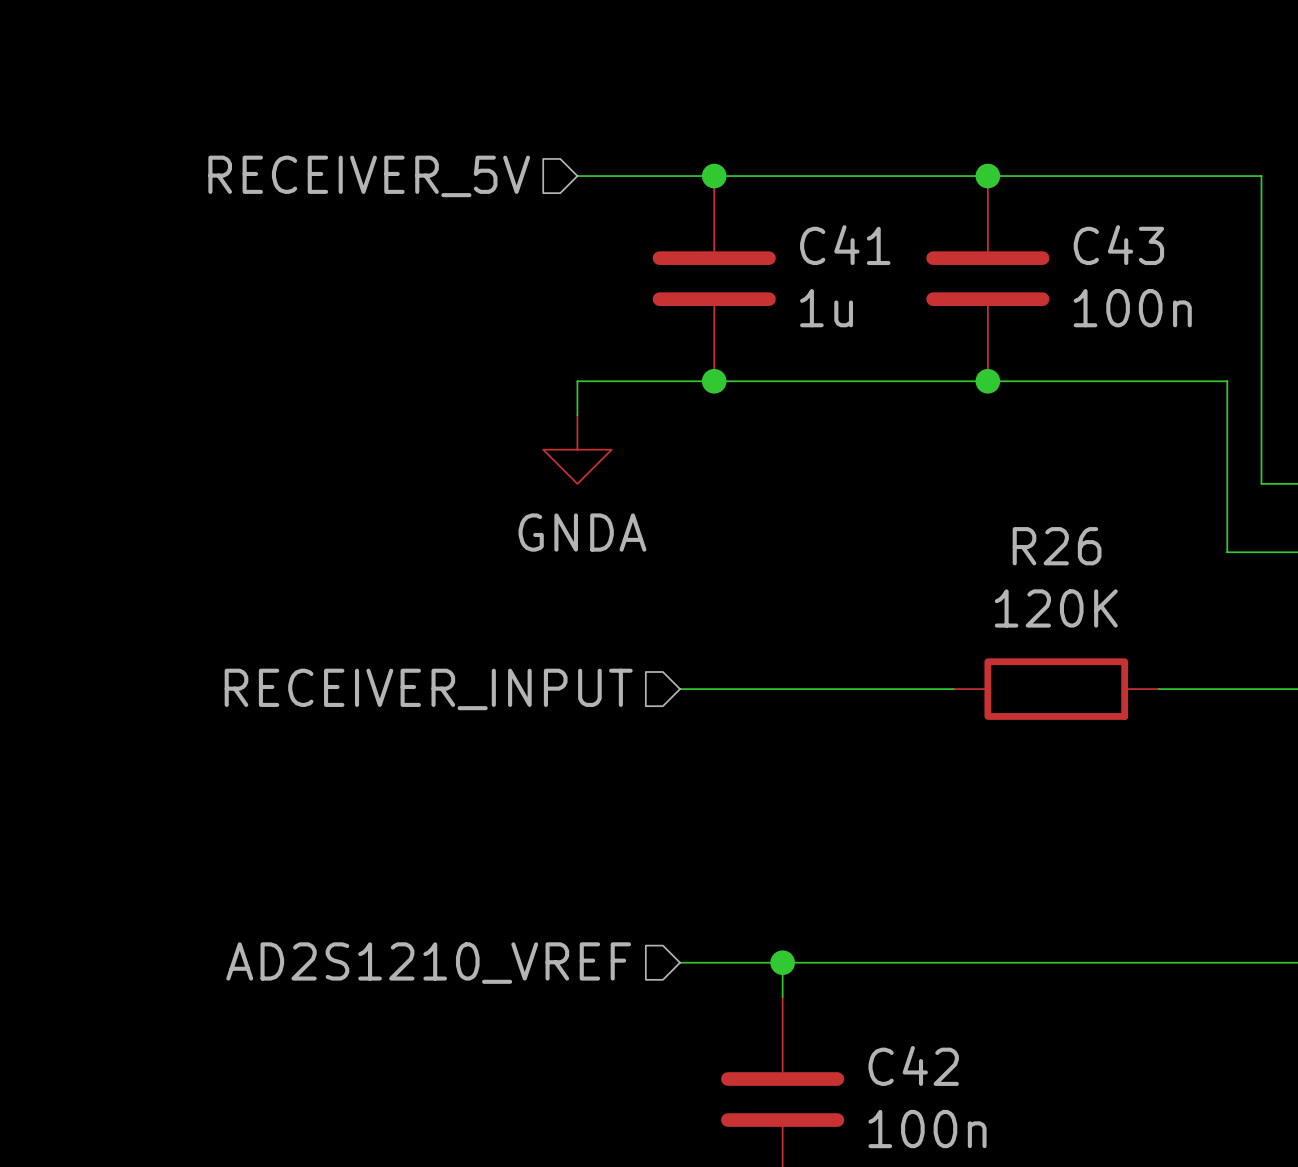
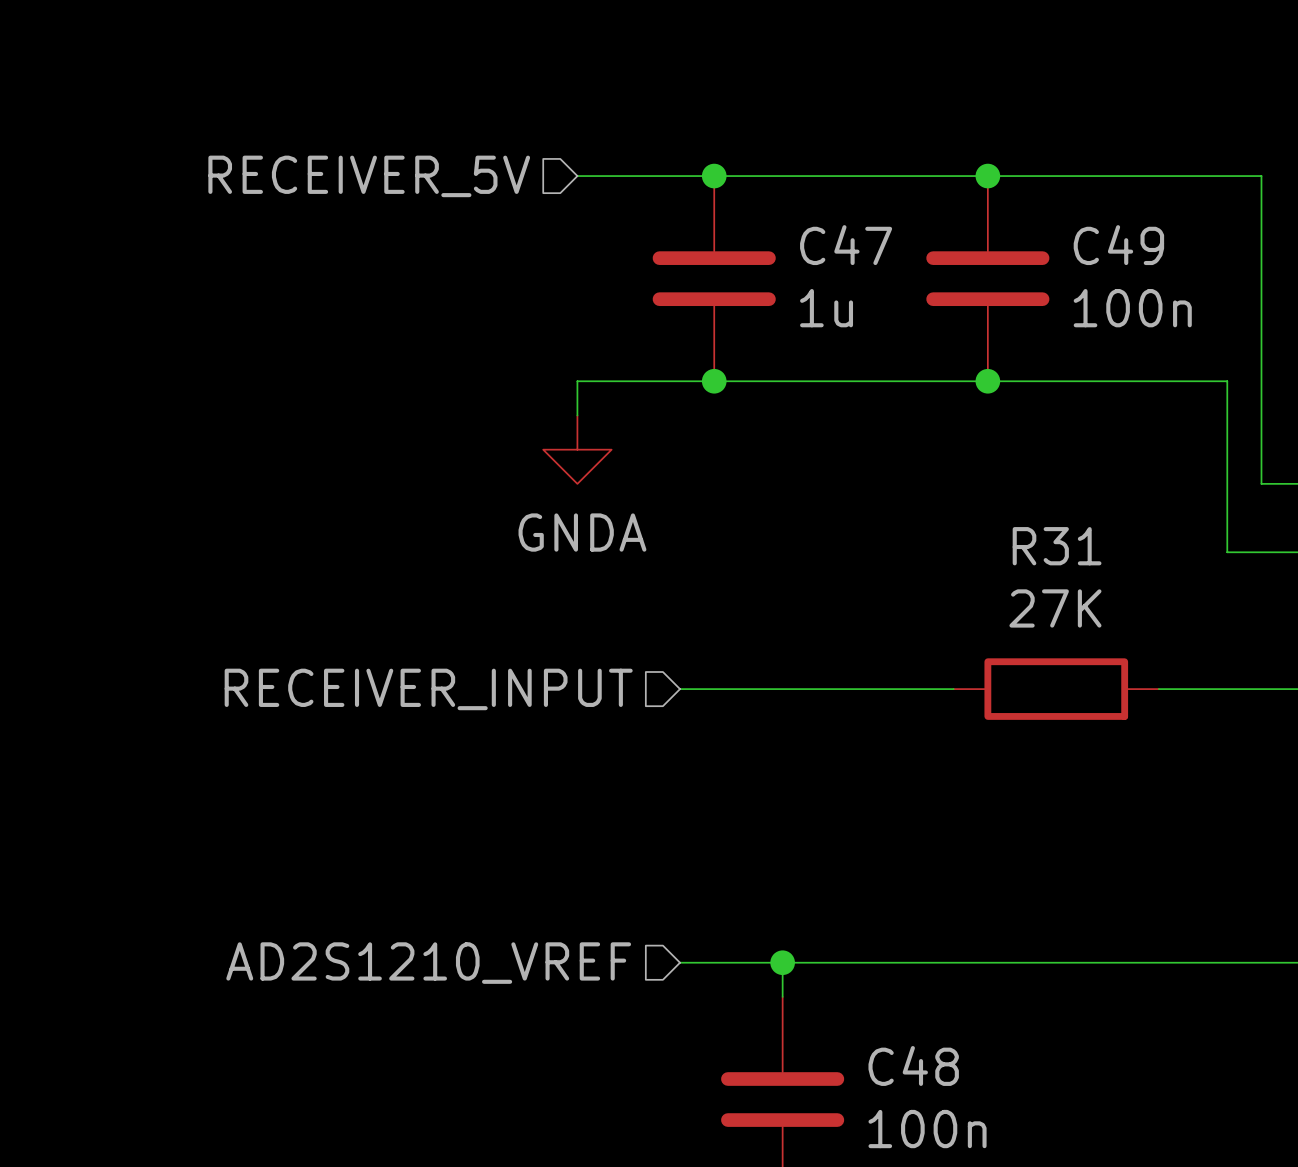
C41 name: C41 (845, 245) -> C47 (846, 245)
C43 name: C43 (1118, 245) -> C49 (1118, 245)
R26 name: R26 (1057, 546) -> R31 (1057, 546)
R26 value: 120K (1056, 608) -> 27K (1055, 608)
C42 name: C42 (913, 1065) -> C48 (913, 1065)

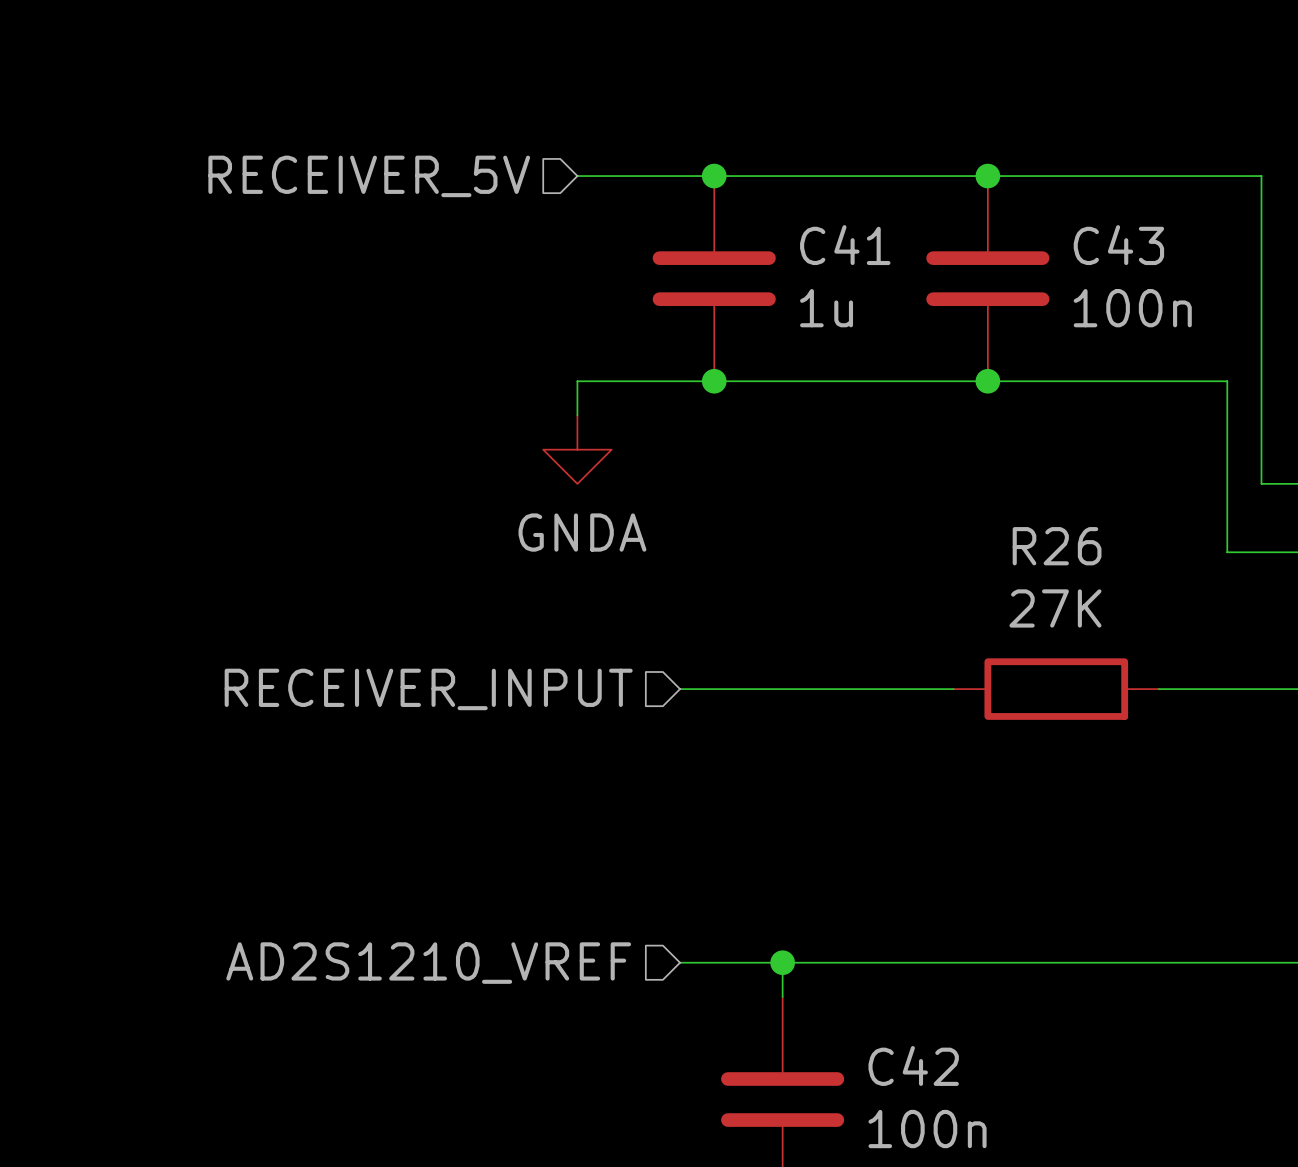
C47 name: C47 (846, 245) -> C41 (845, 245)
C49 name: C49 (1118, 245) -> C43 (1118, 245)
R31 name: R31 (1057, 546) -> R26 (1057, 546)
C48 name: C48 (913, 1065) -> C42 (913, 1065)

